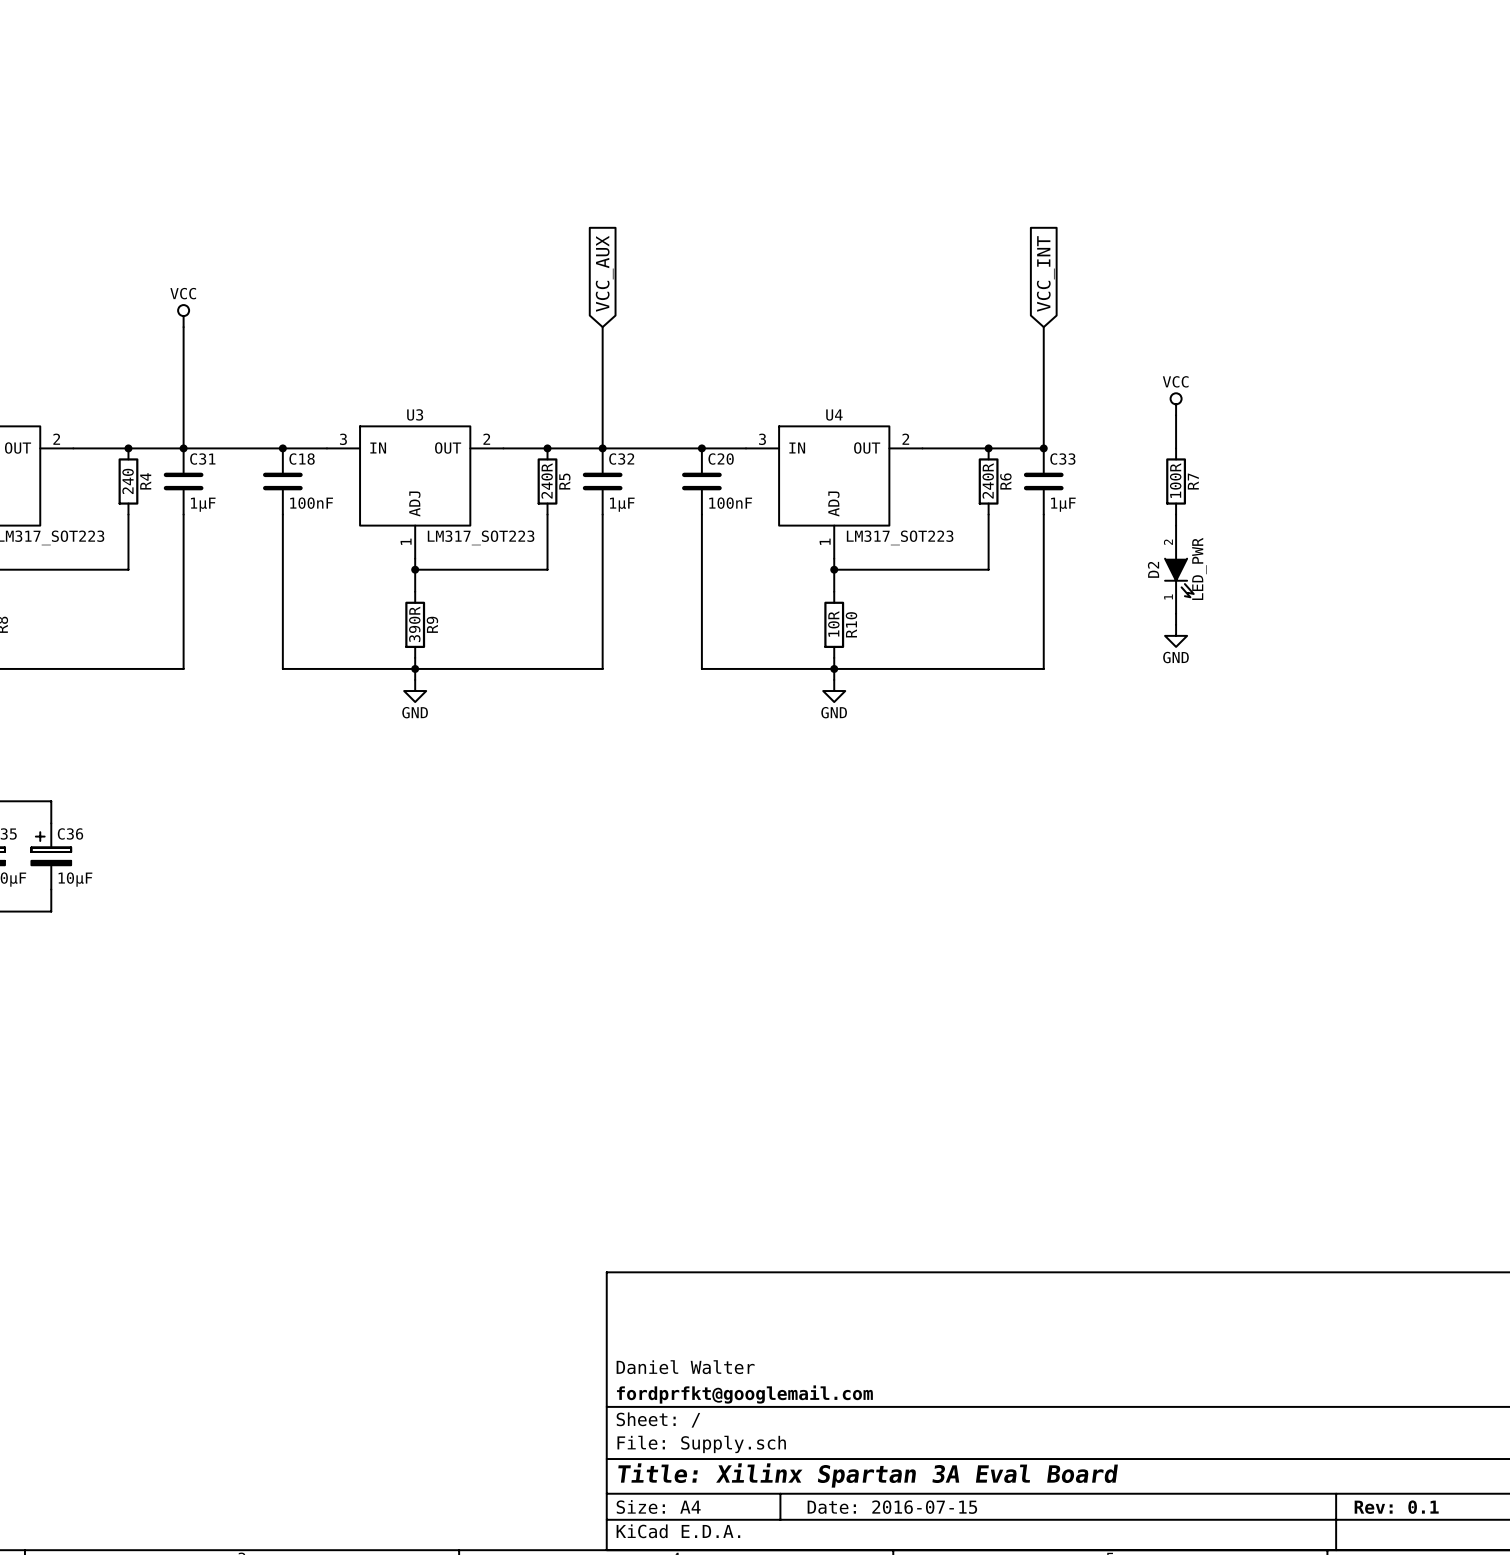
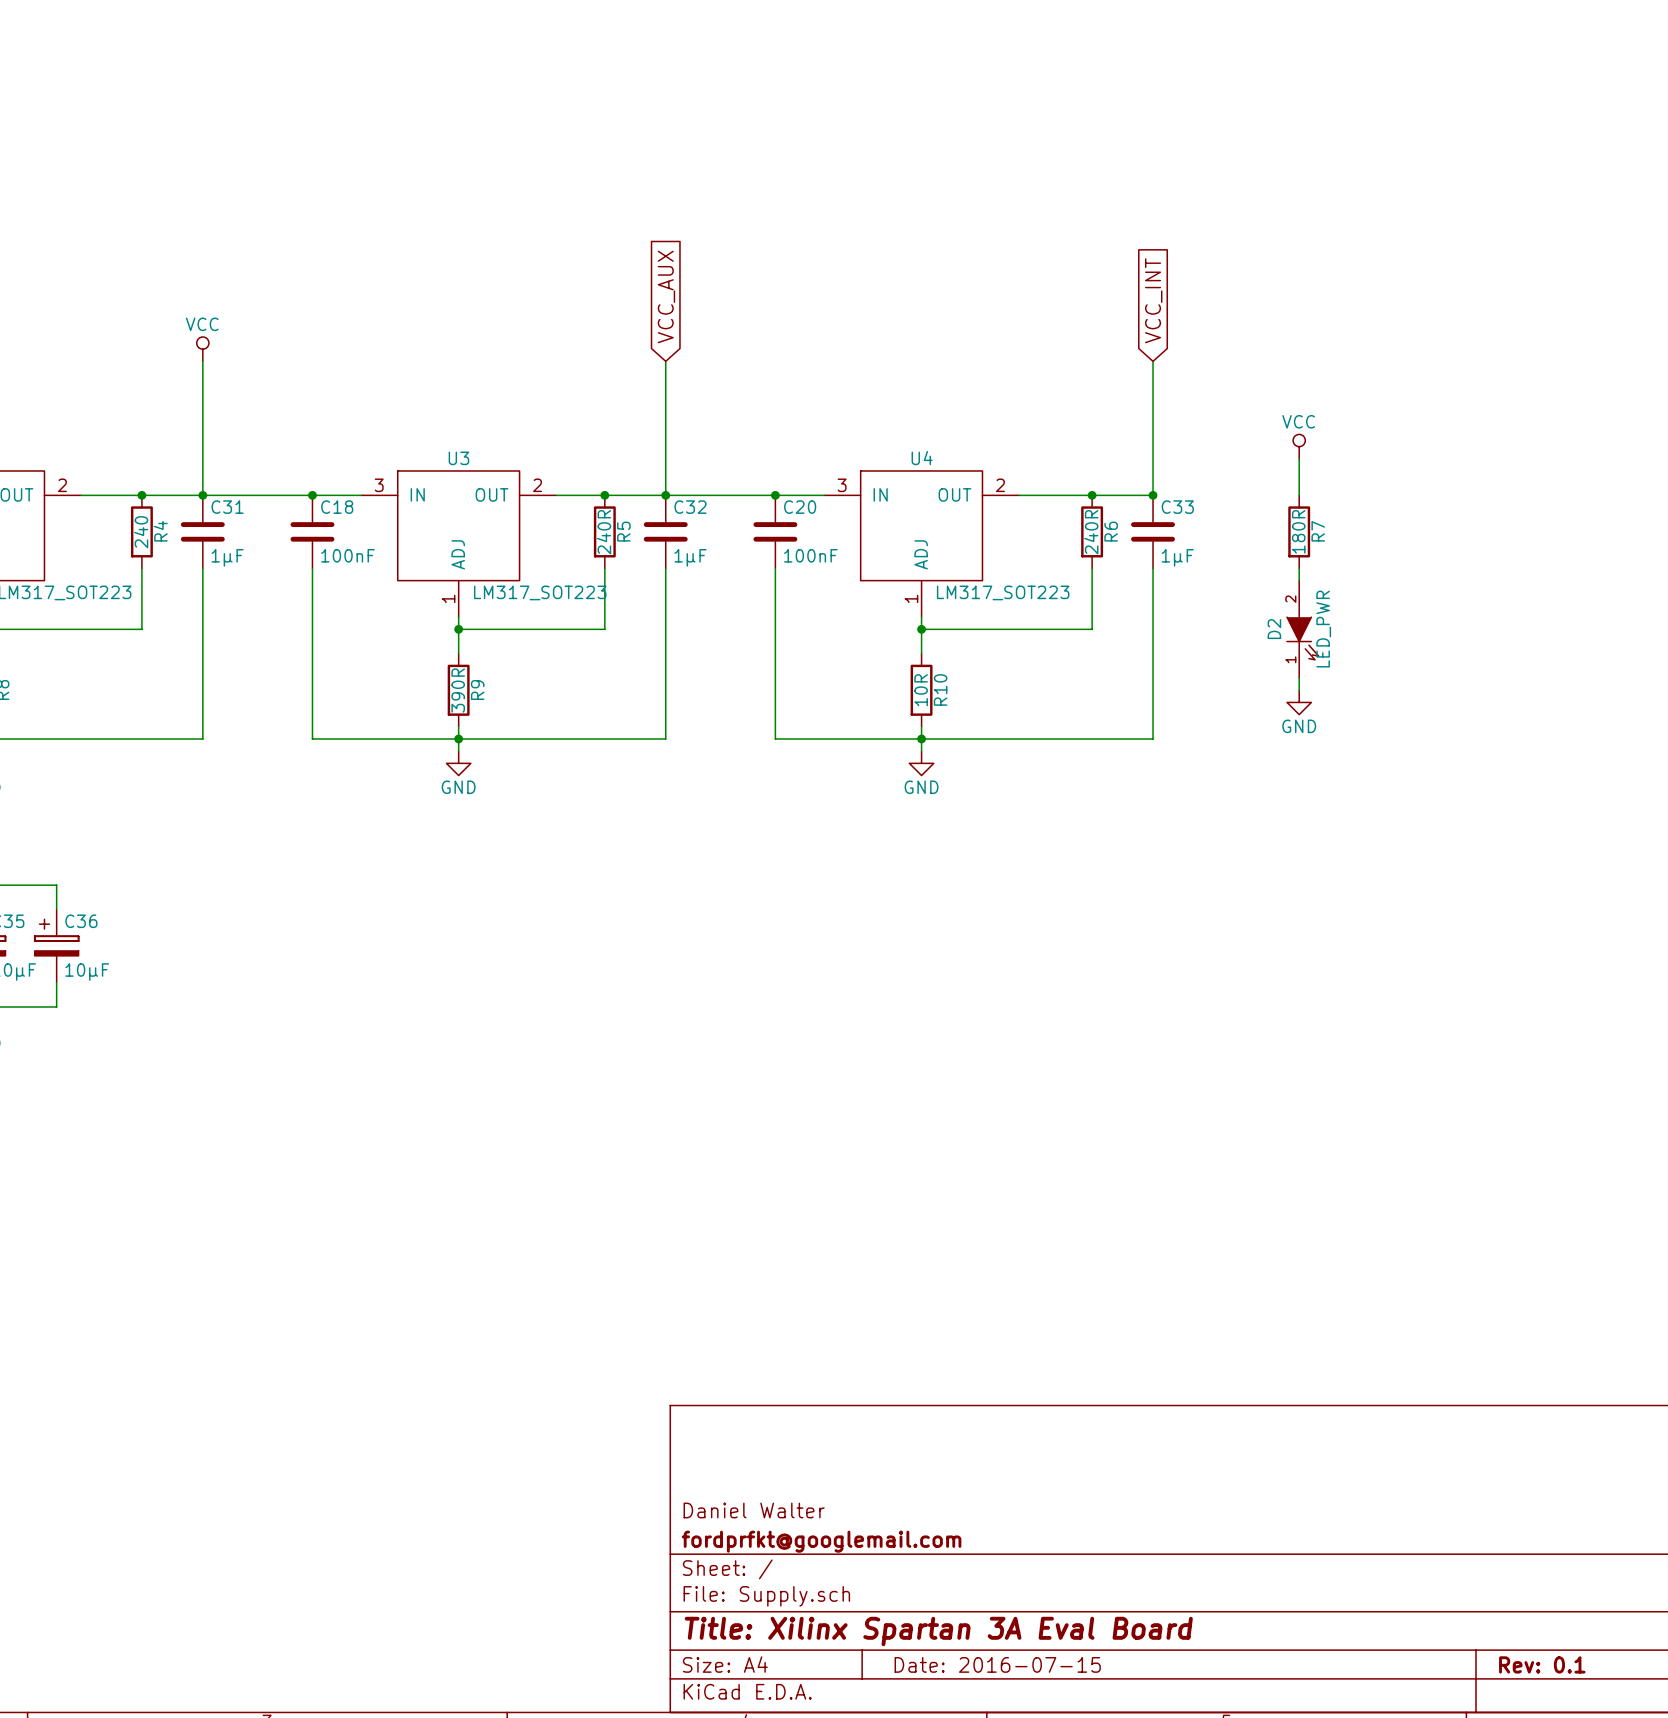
R7 value: 100R (1175, 480) -> 180R (1298, 531)

